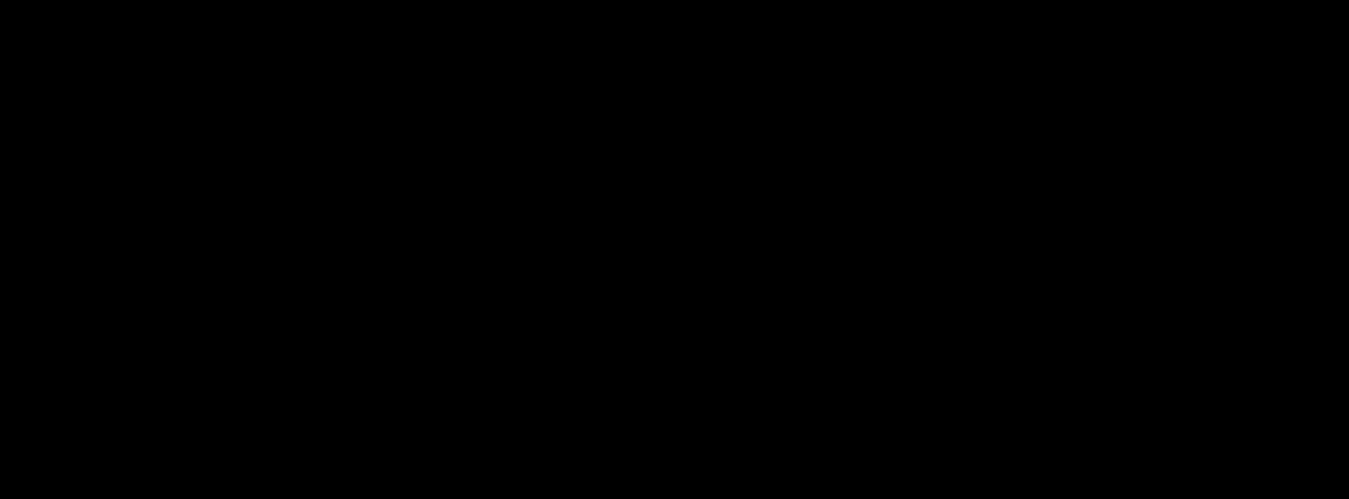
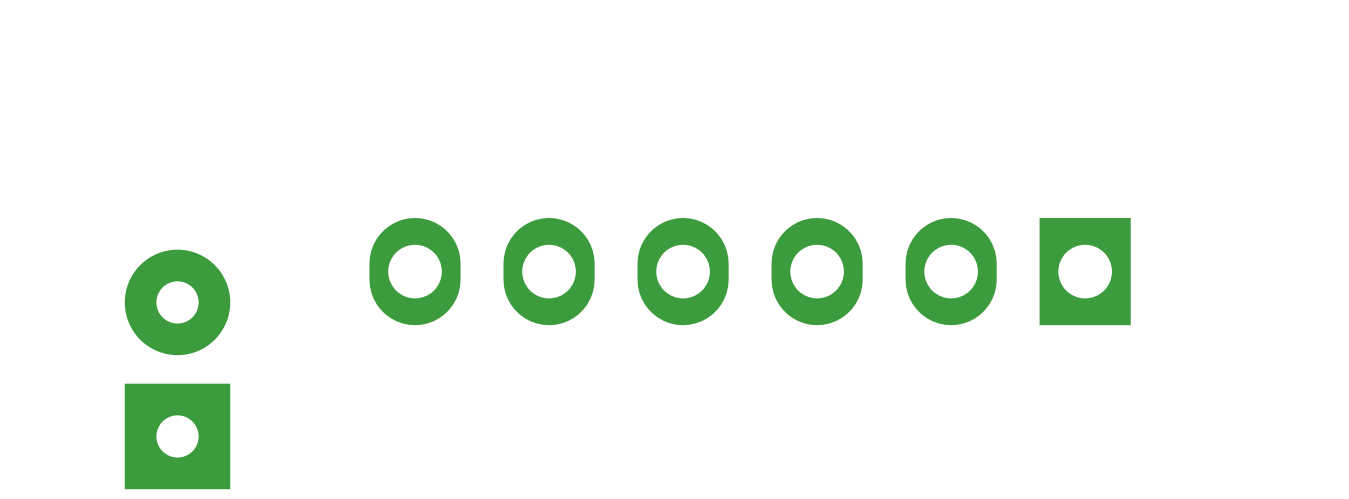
part: none -> (750, 271)
part: none -> (177, 369)

